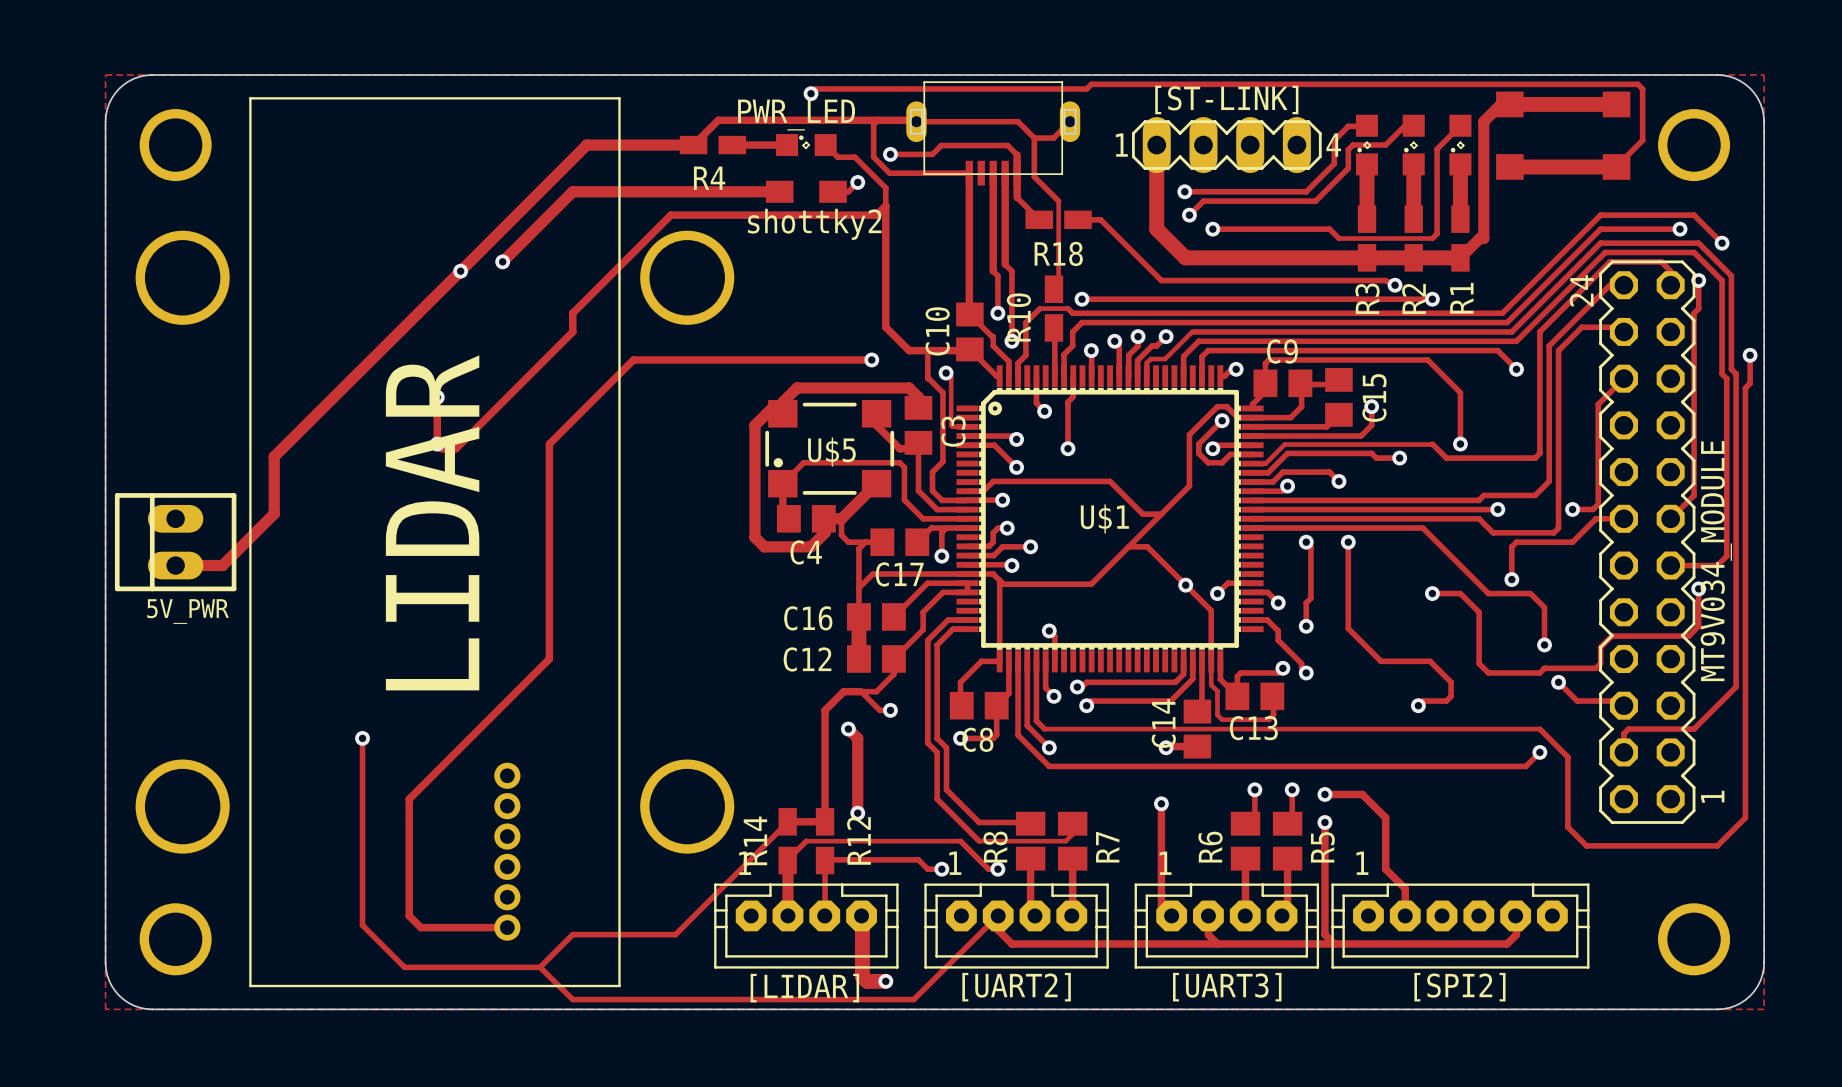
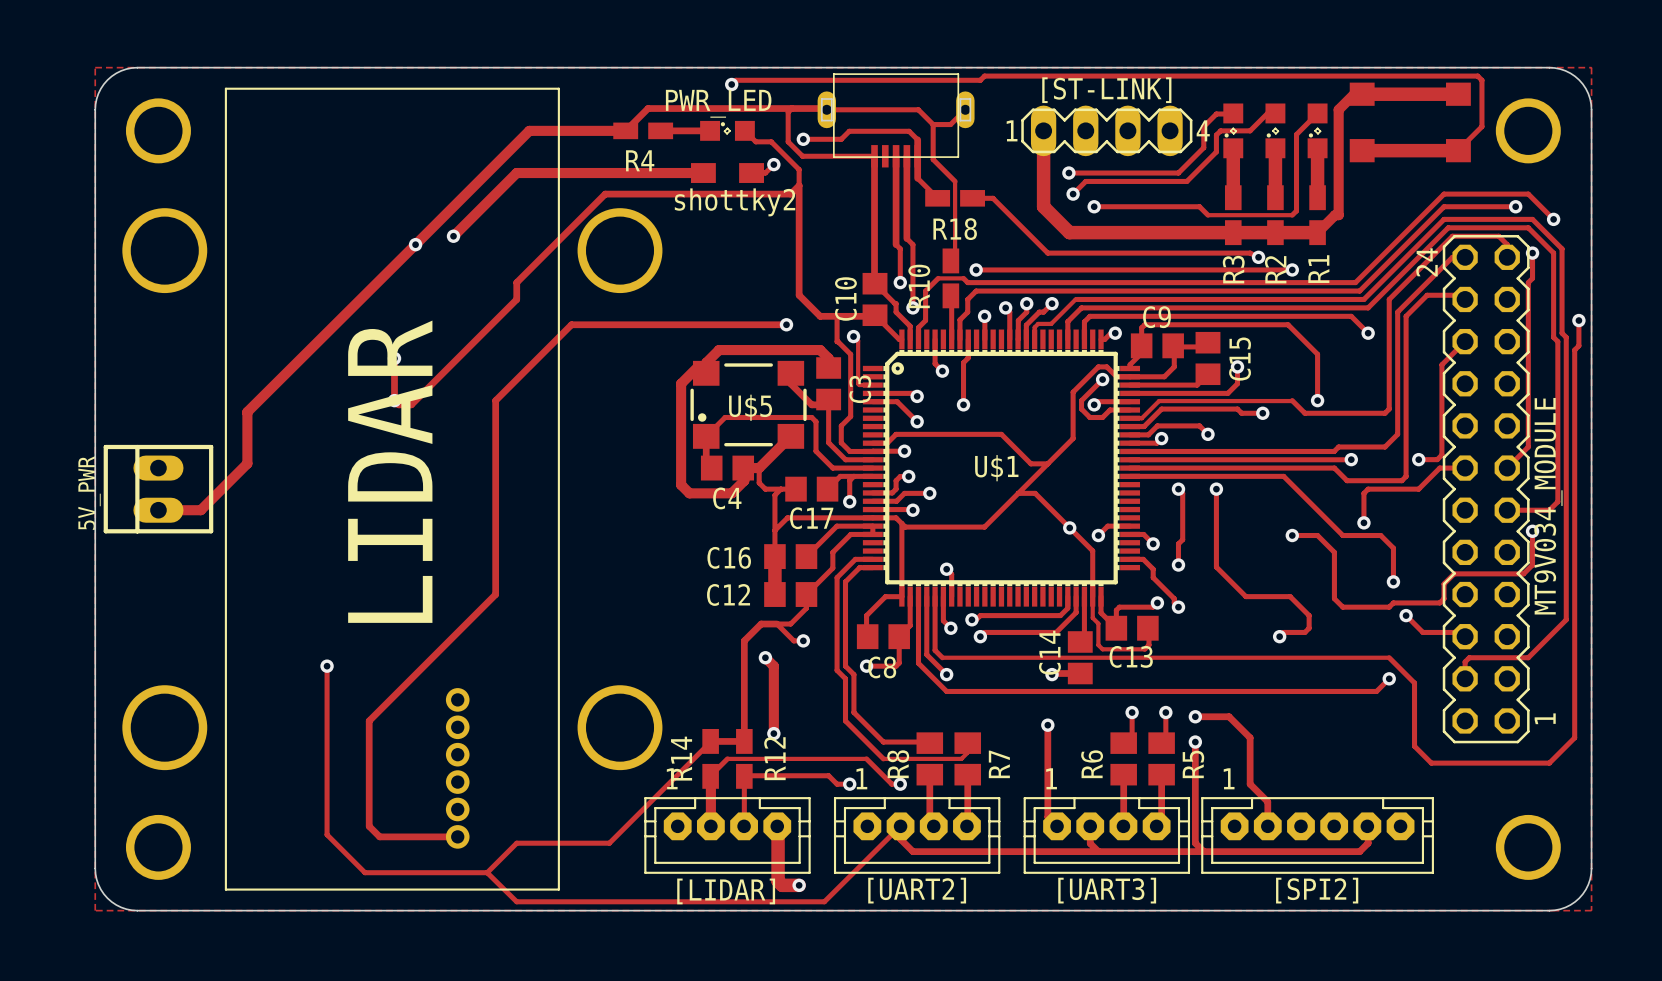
5V_PWR name rotation: 0° (188, 611) -> 90° counterclockwise (89, 492)

